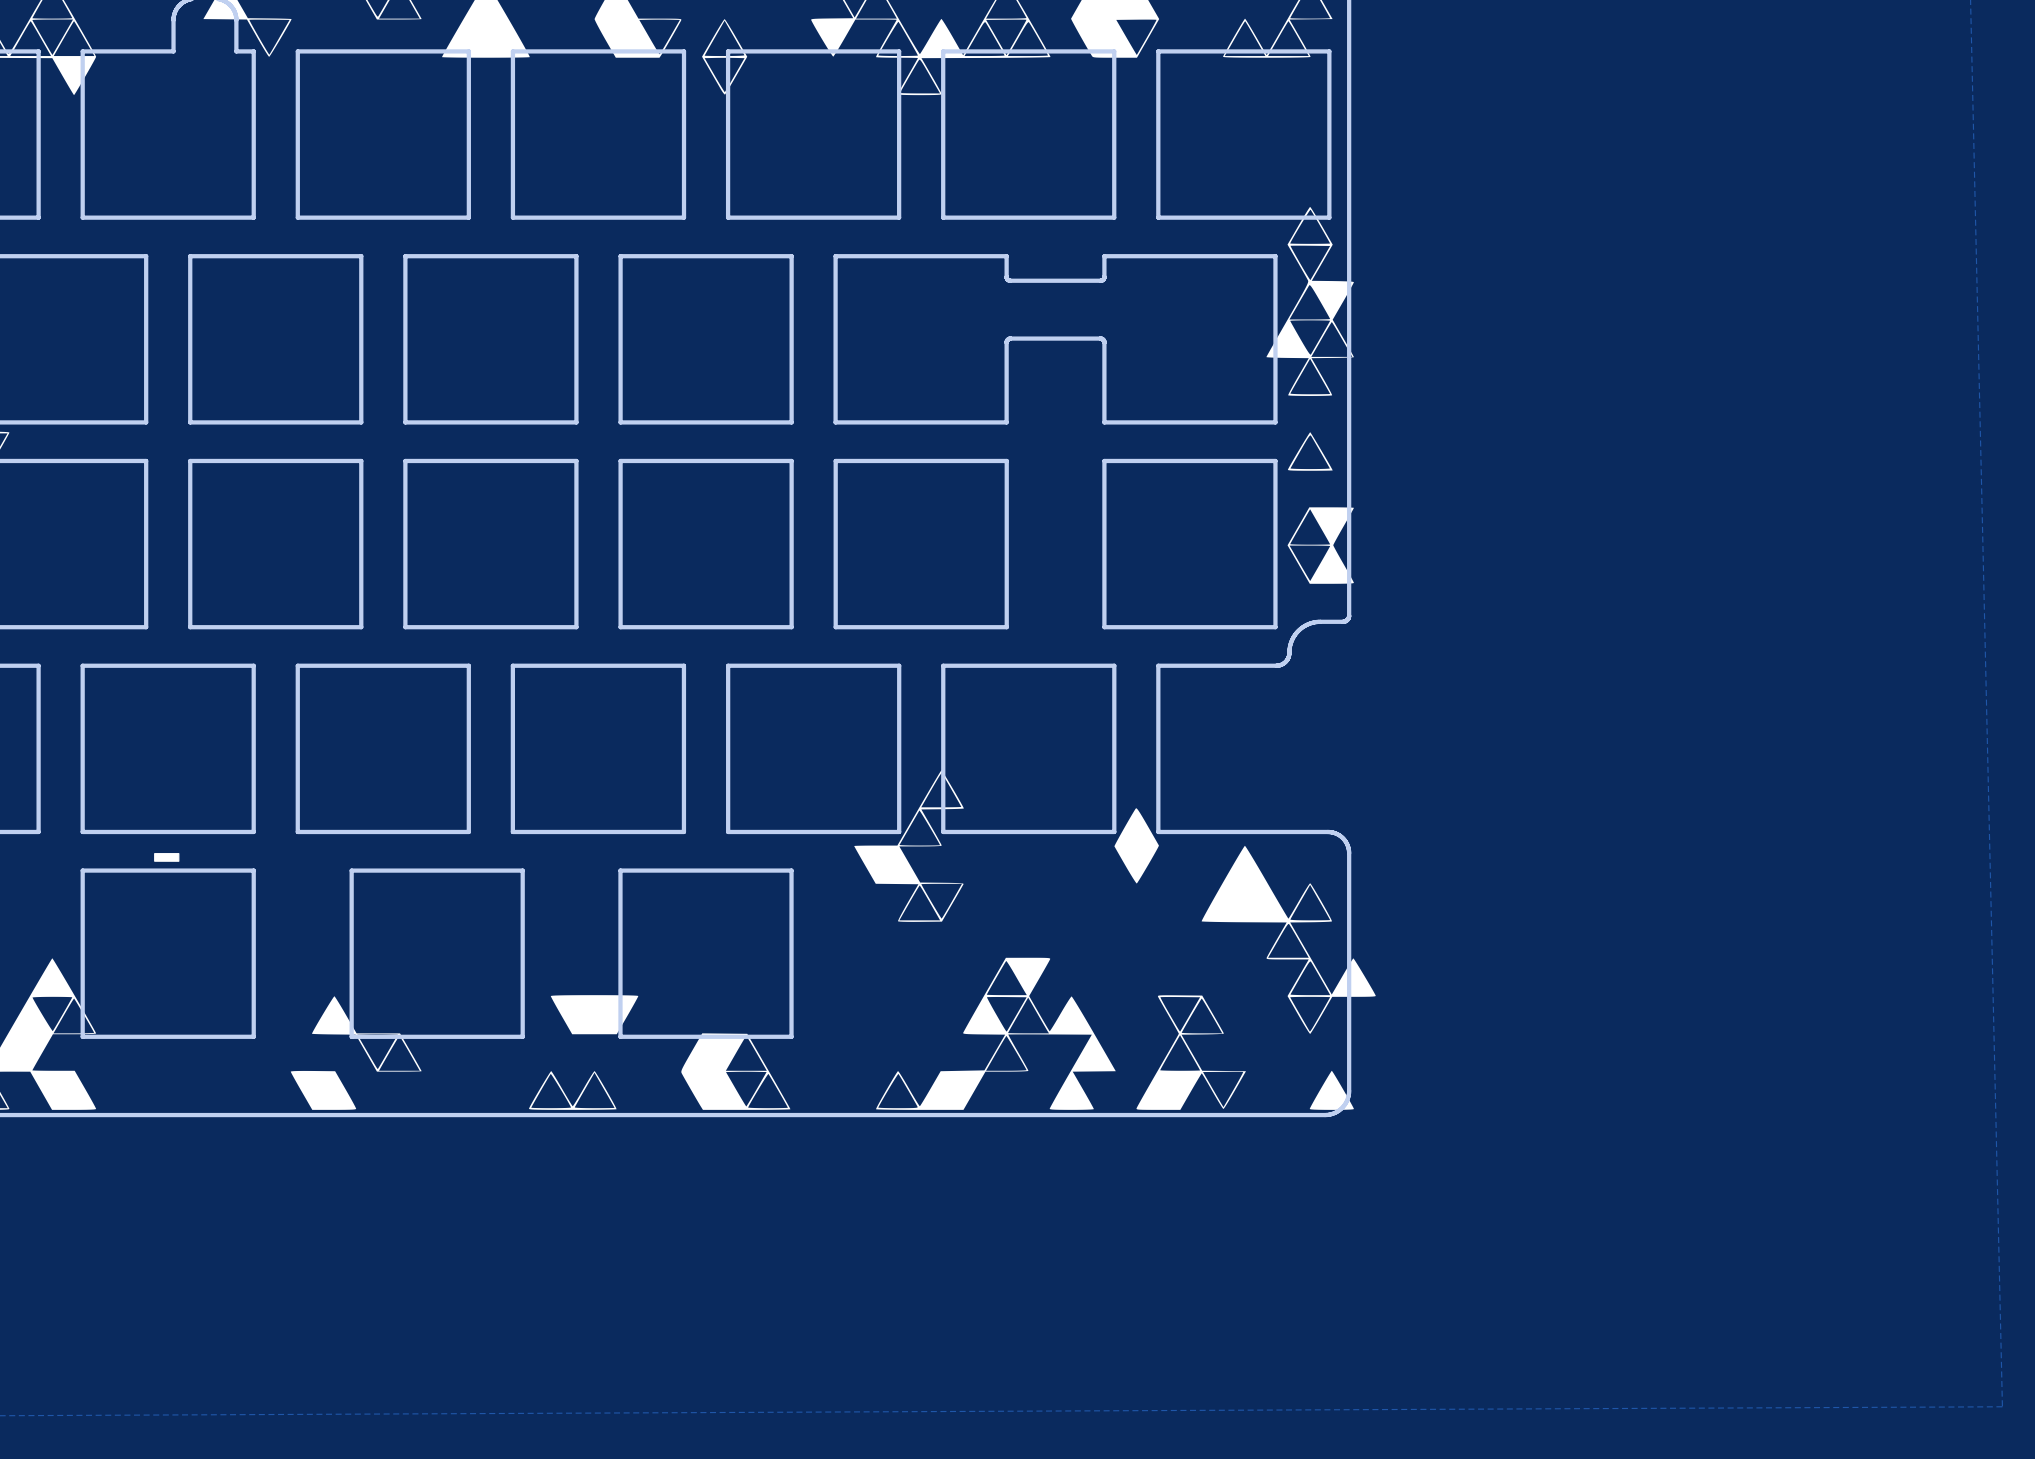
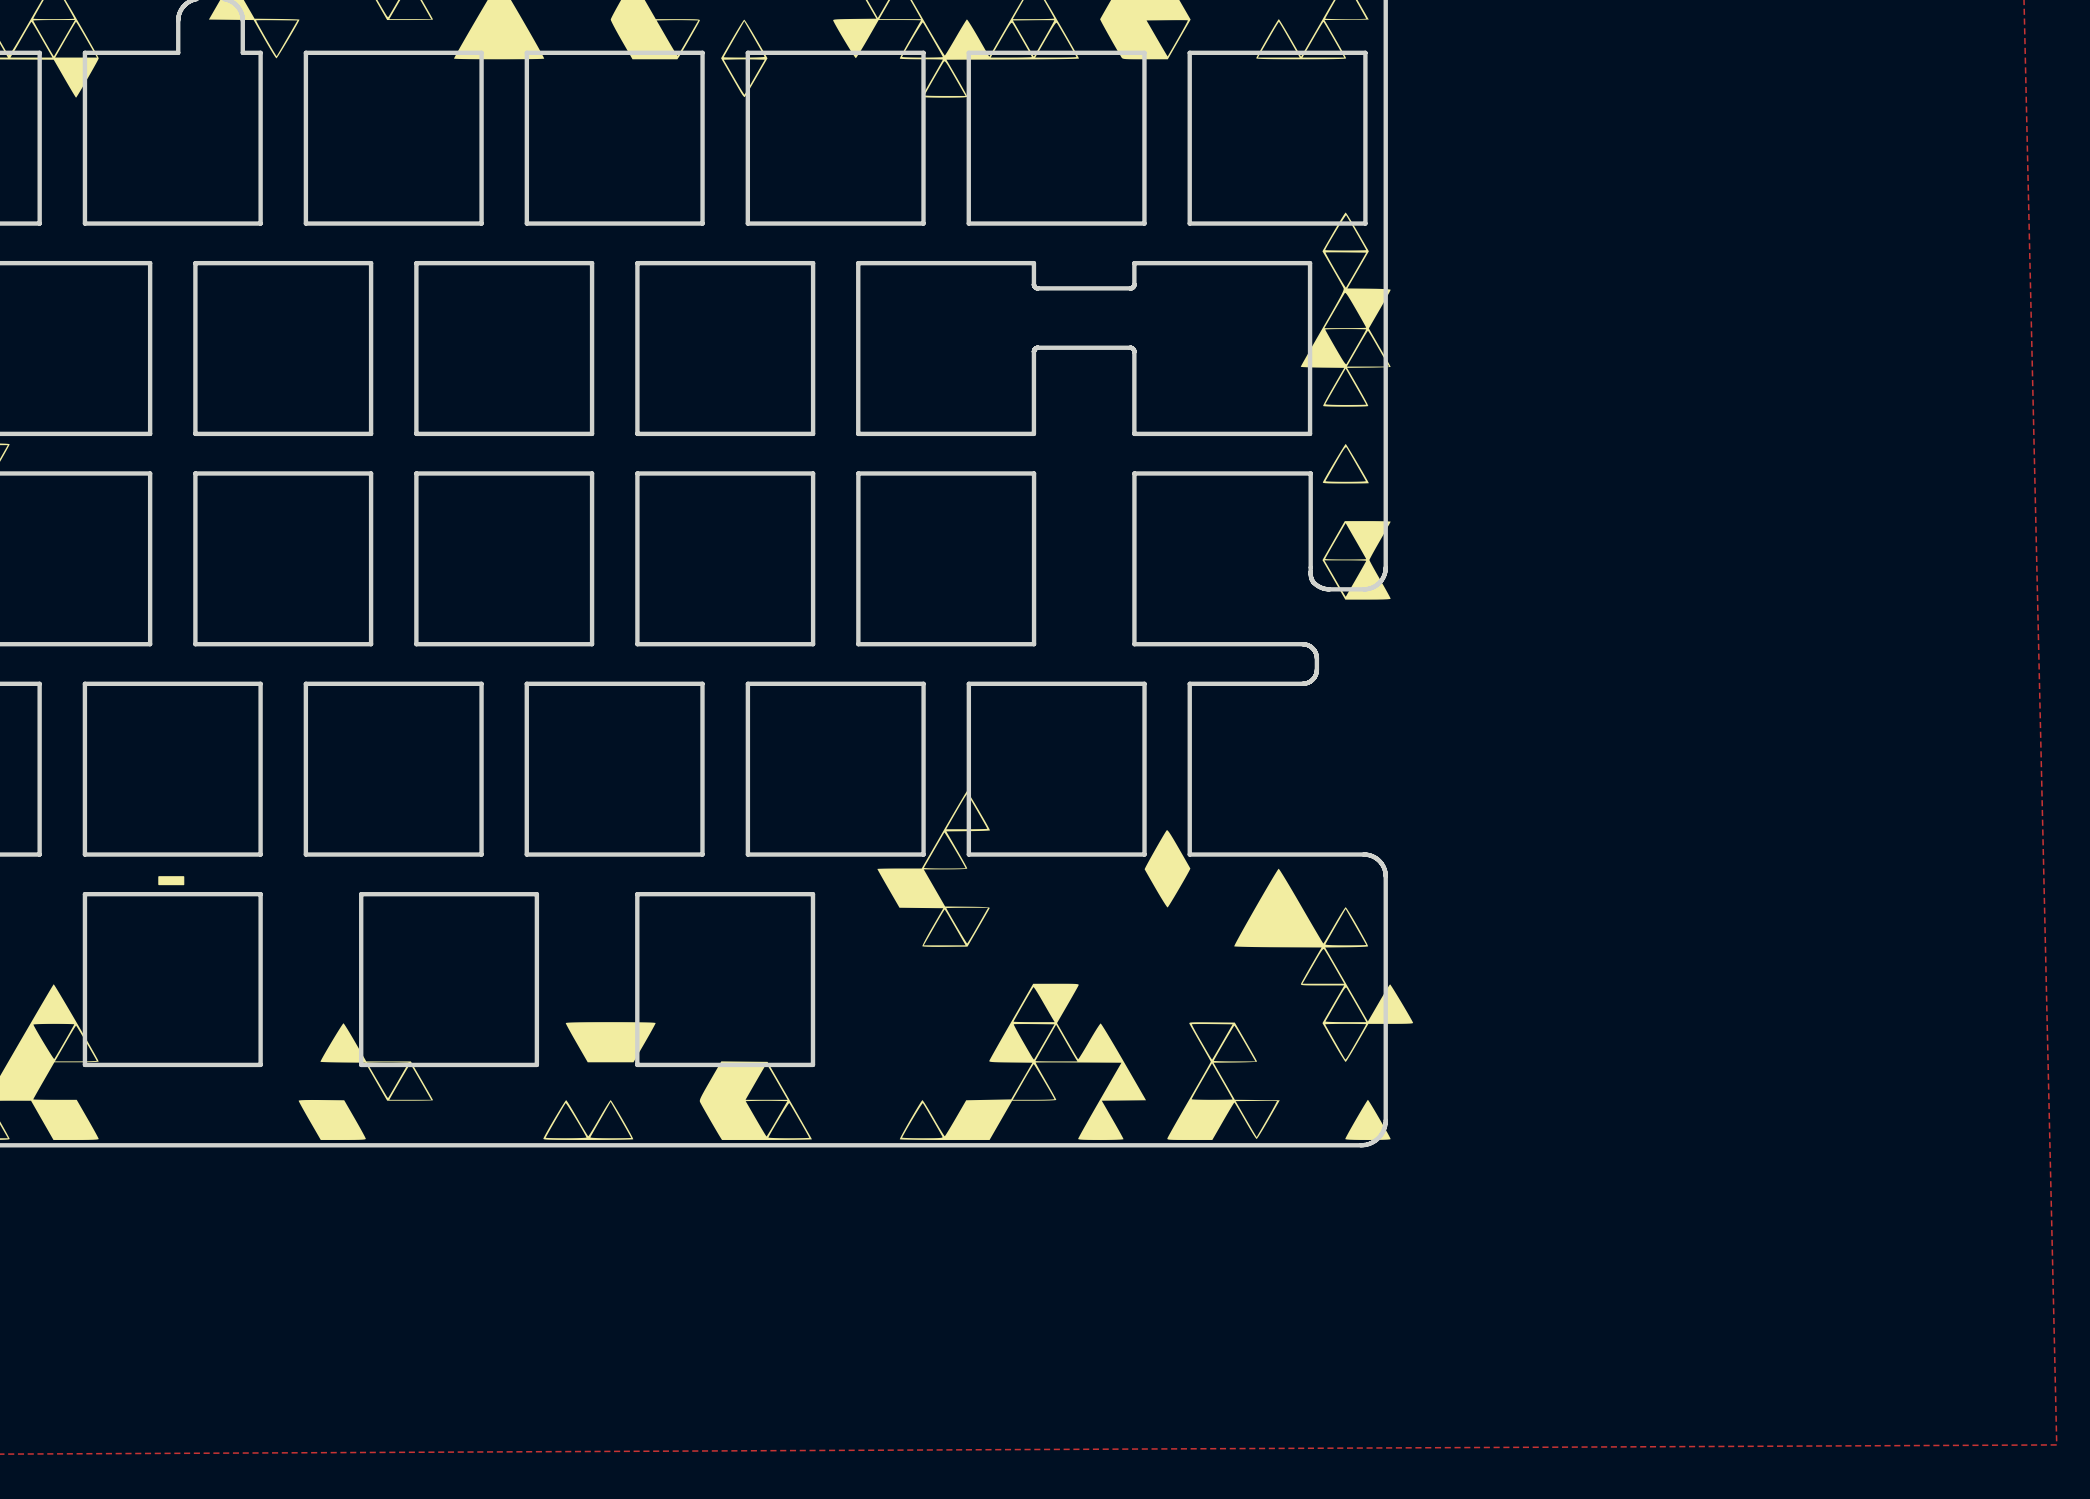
board edge: (1104, 460) (1104, 627) (1275, 627) (1275, 460) (1104, 460) -> none
board edge: (1349, 552) (1347, 619) (1343, 621) (1315, 622) (1304, 626) (1293, 638) (1286, 661) (1279, 665) (1268, 665) -> (1385, 567) (1380, 581) (1368, 588) (1327, 589) (1313, 582) (1310, 572) (1310, 473) (1134, 473) (1134, 644) (1306, 644) (1312, 647) (1315, 653) (1316, 670) (1312, 680) (1302, 683)

